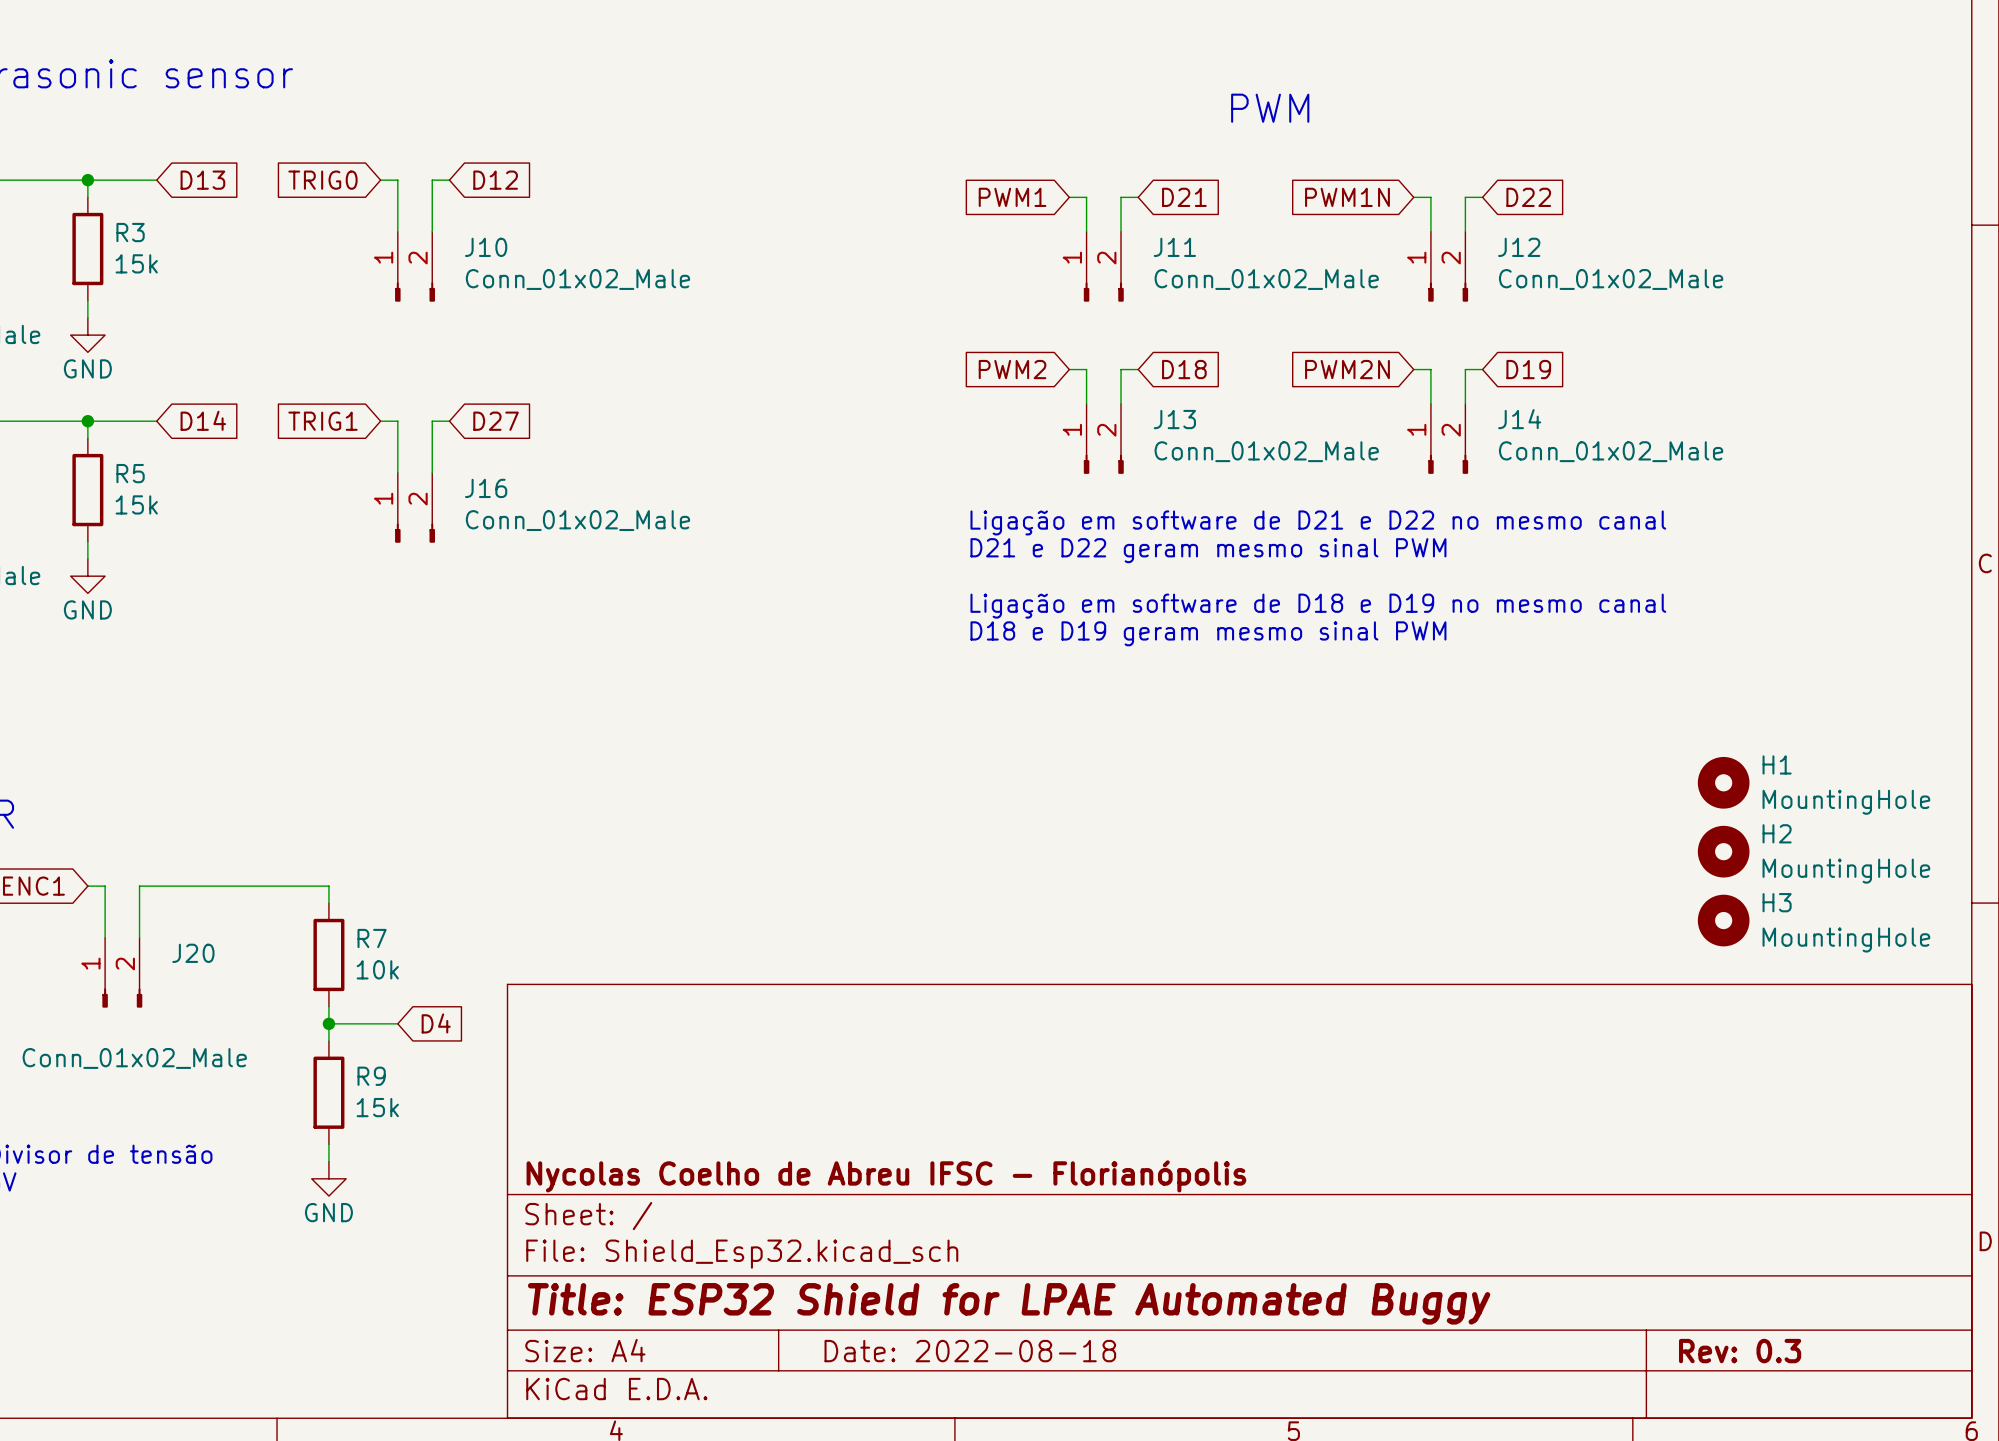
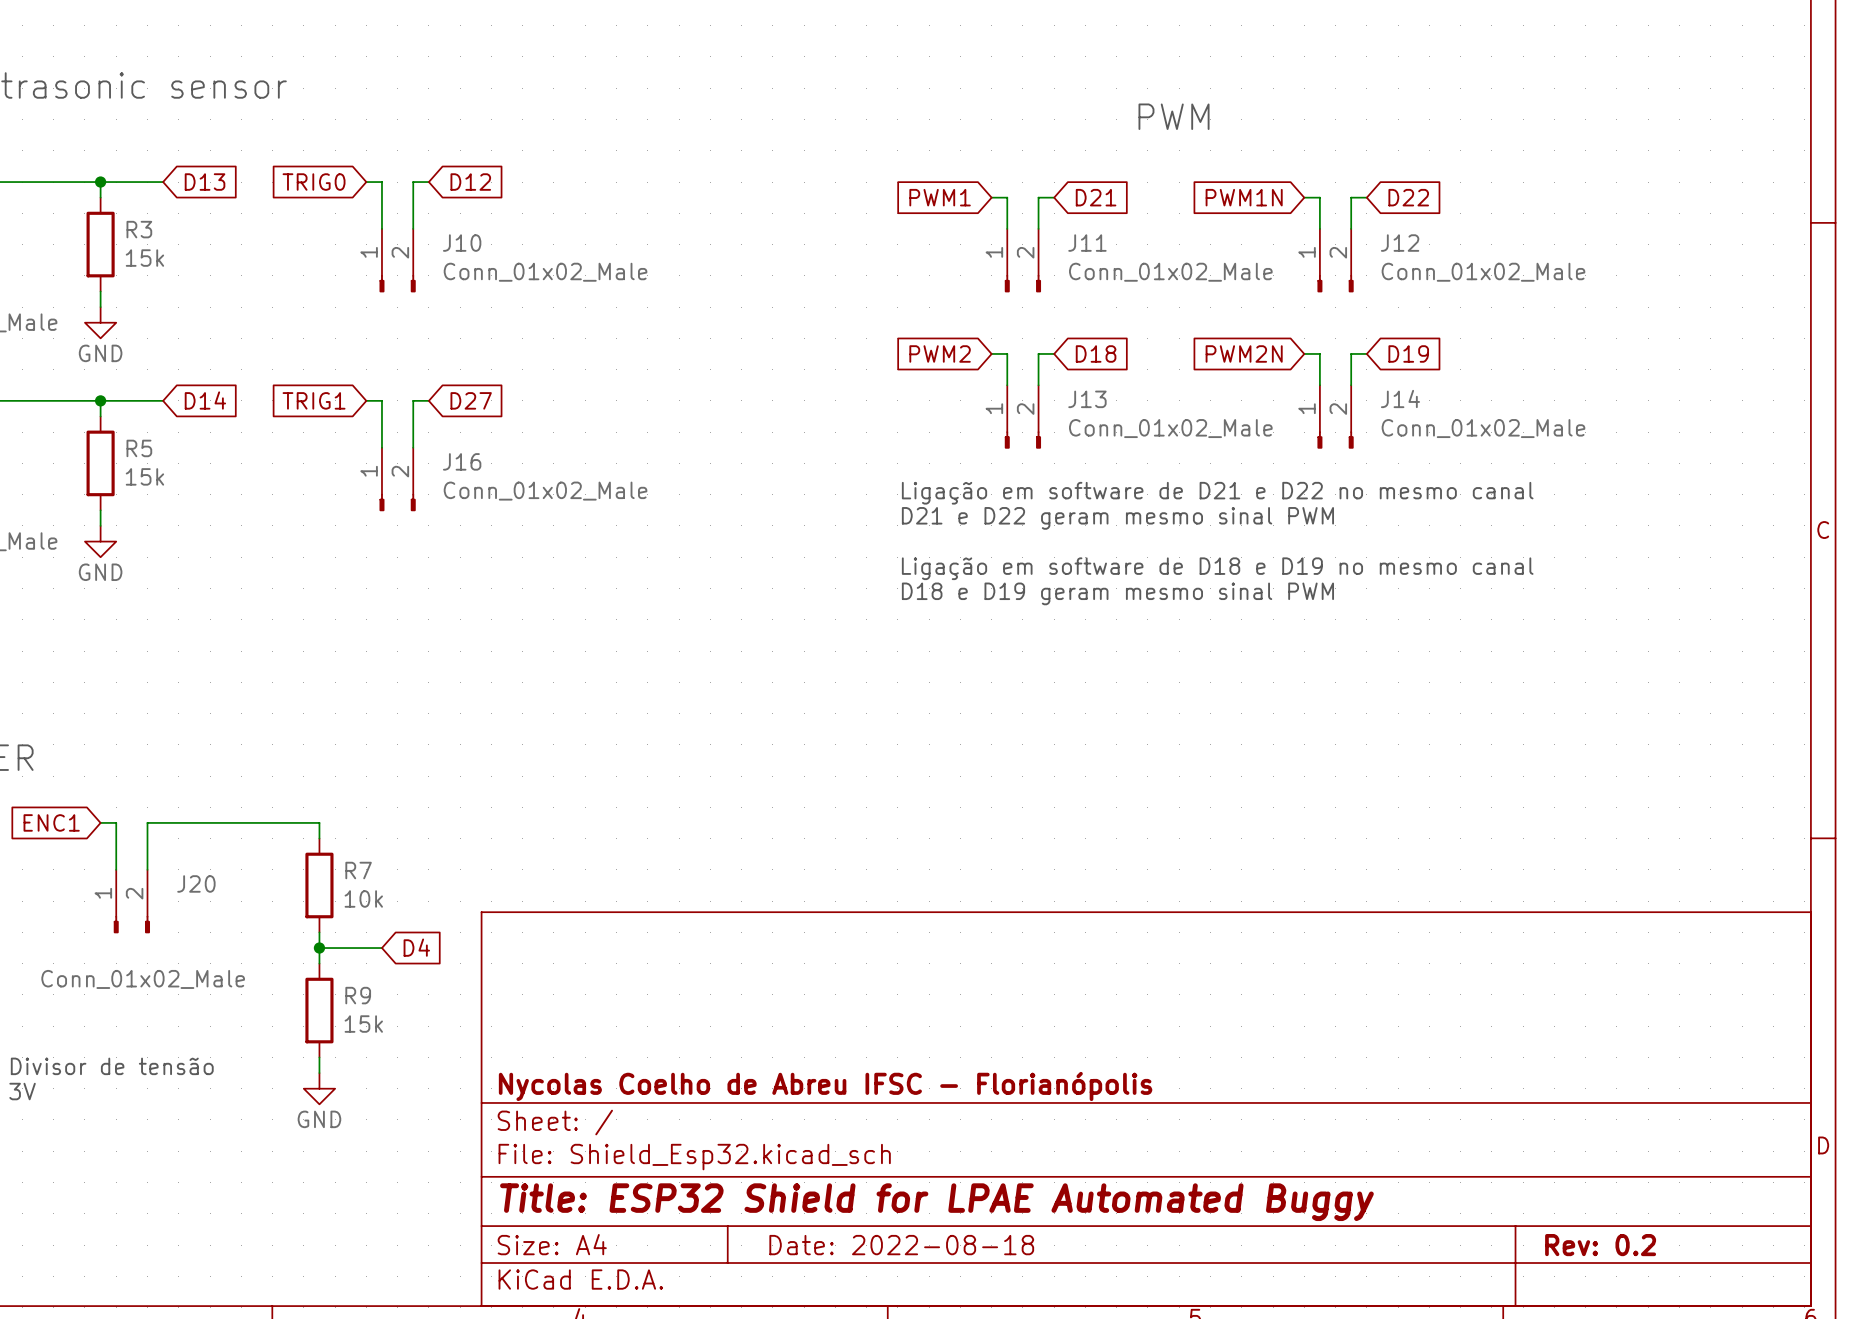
H1: MountingHole (1723, 782) -> none
H2: MountingHole (1723, 851) -> none
H3: MountingHole (1723, 920) -> none
title block: Rev: 0.3 (1740, 1351) -> Rev: 0.2 (1600, 1245)

